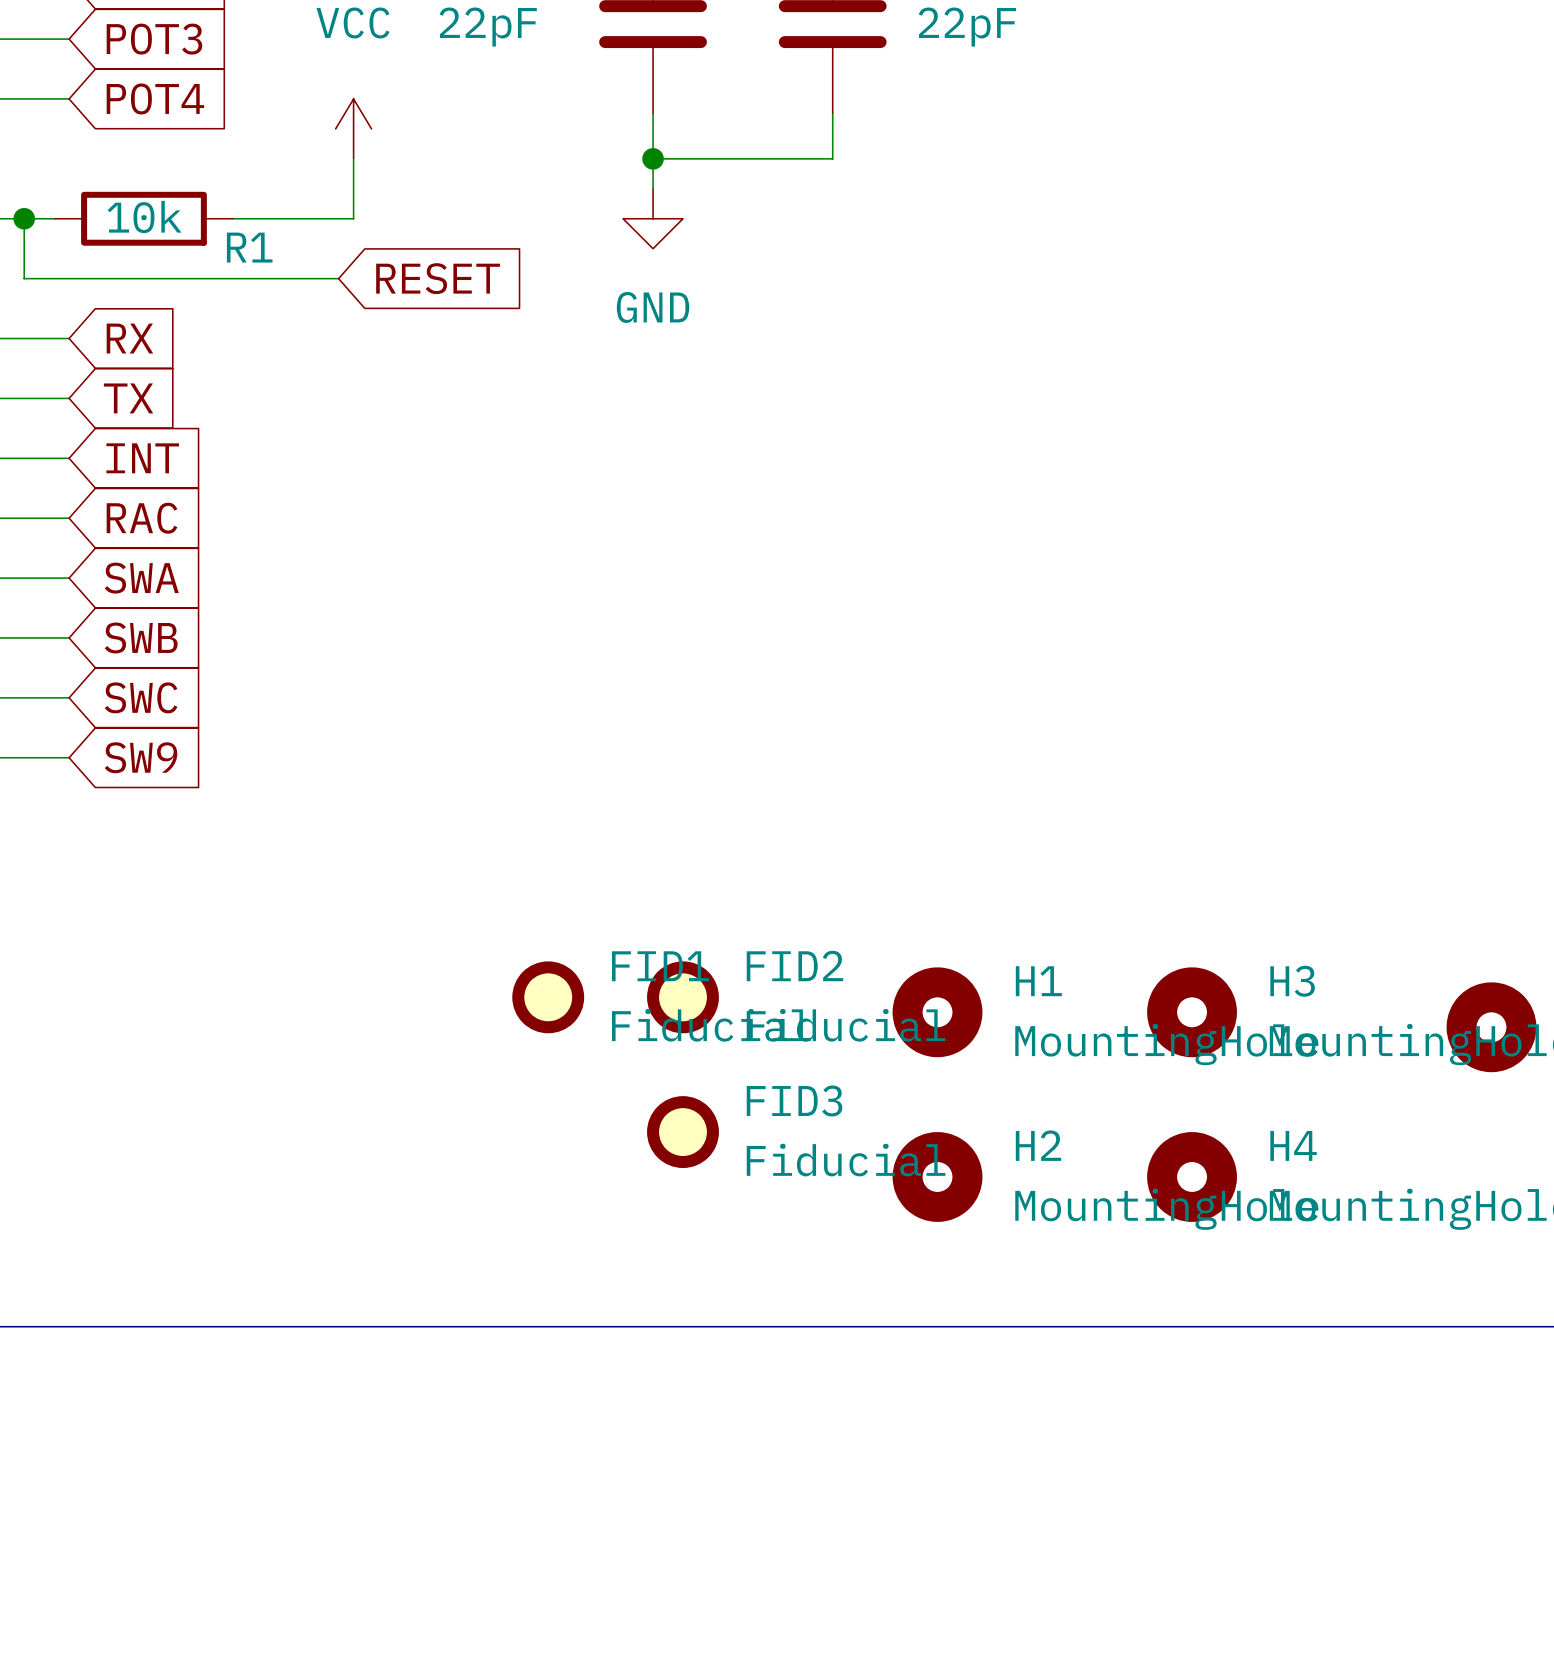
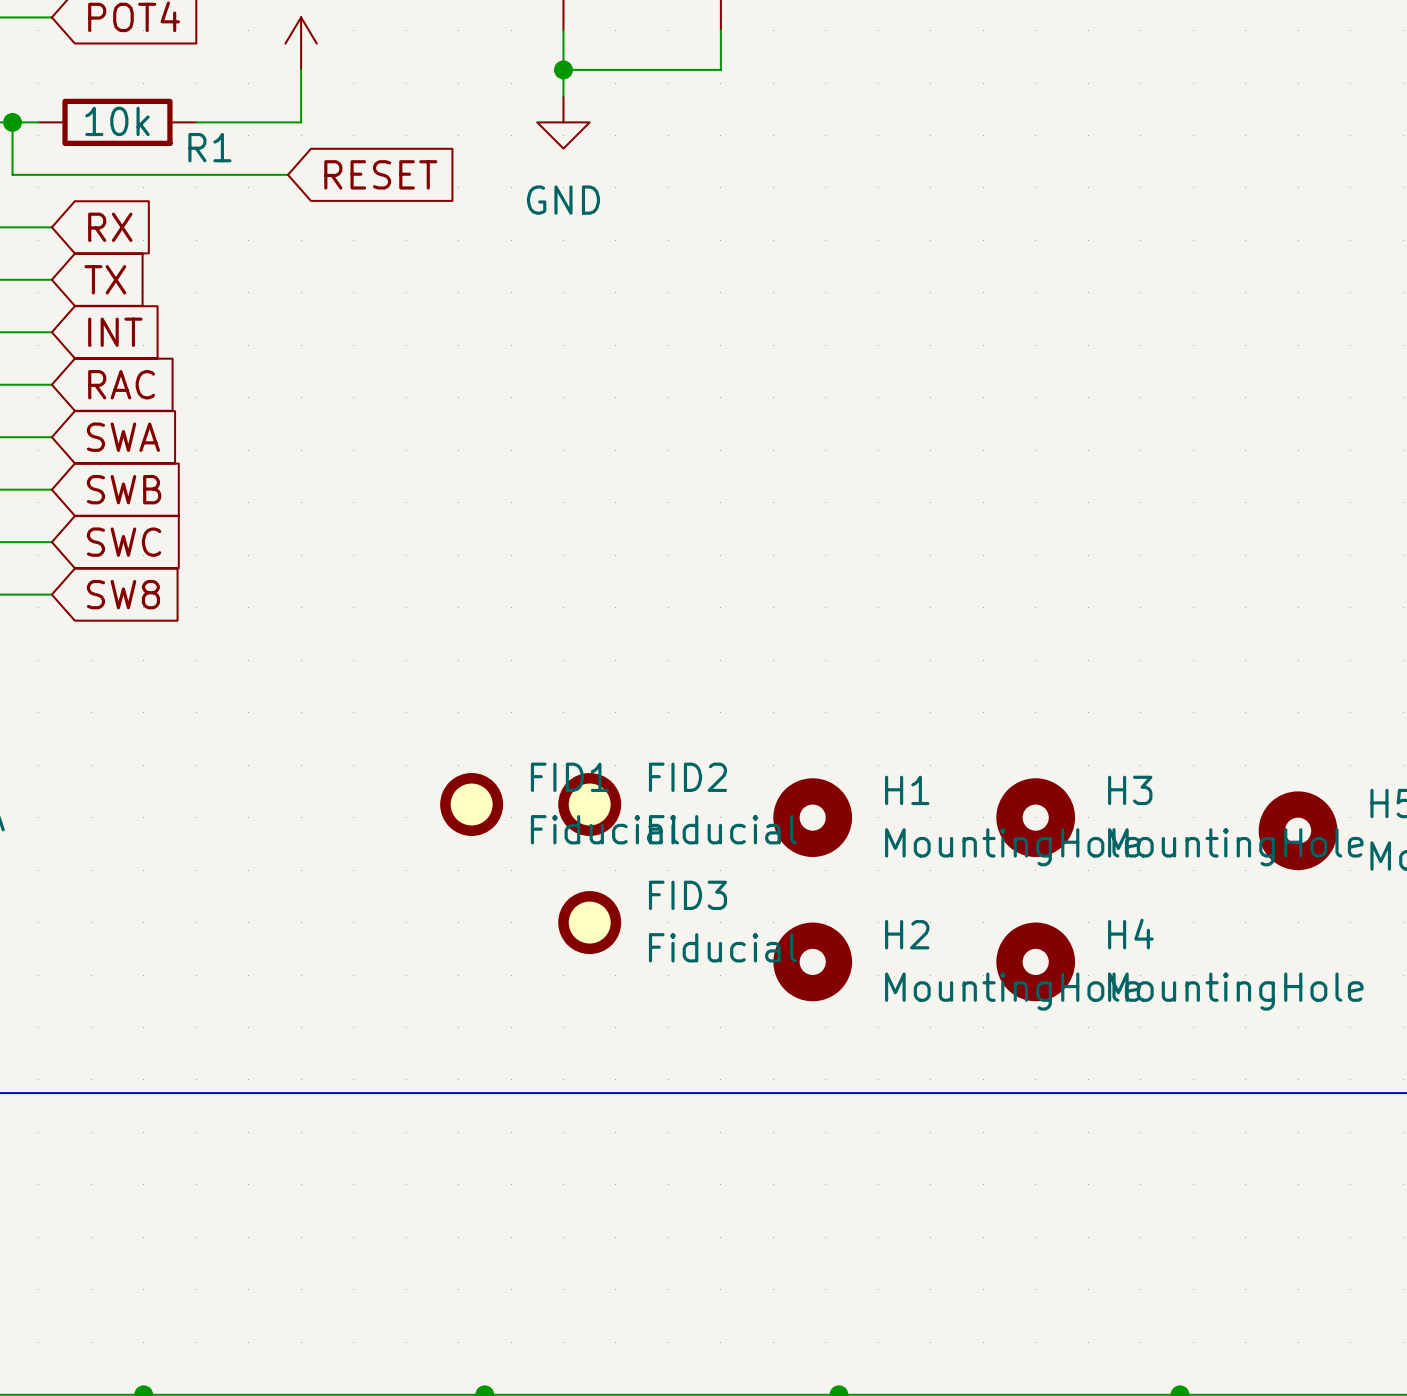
global label: SW9 (141, 757) -> SW8 (123, 594)

